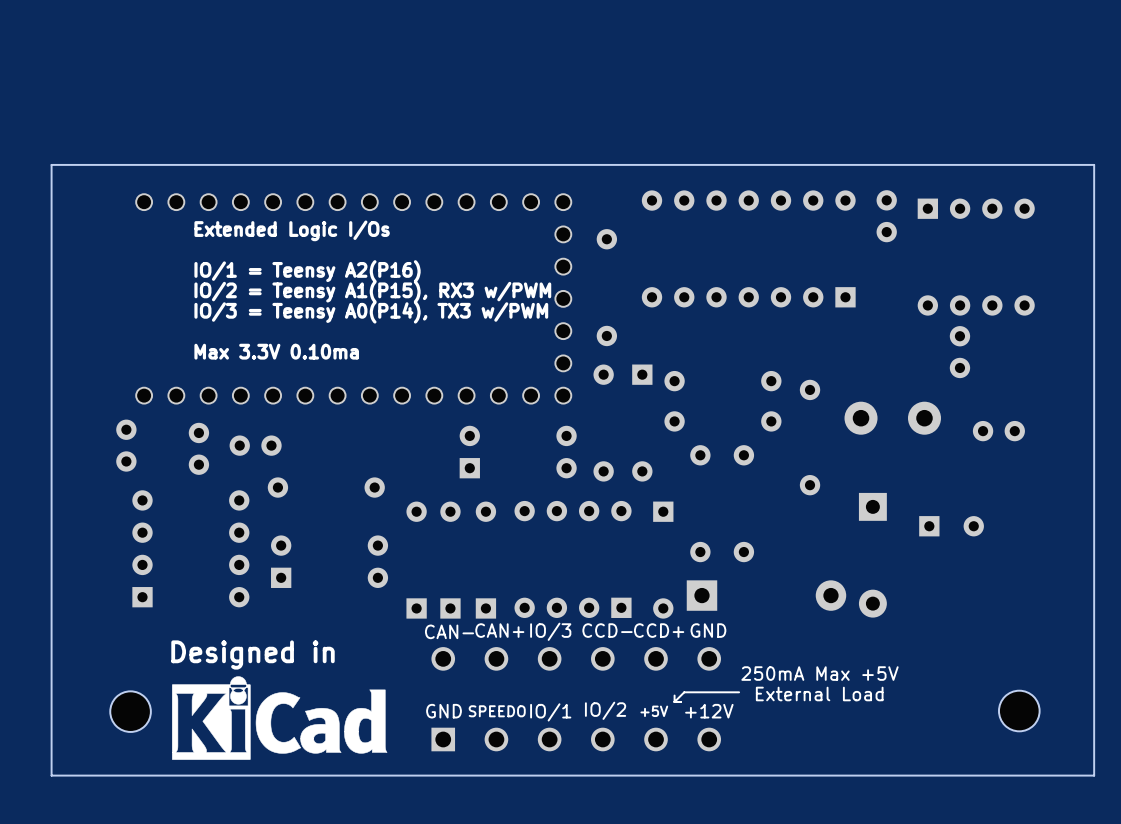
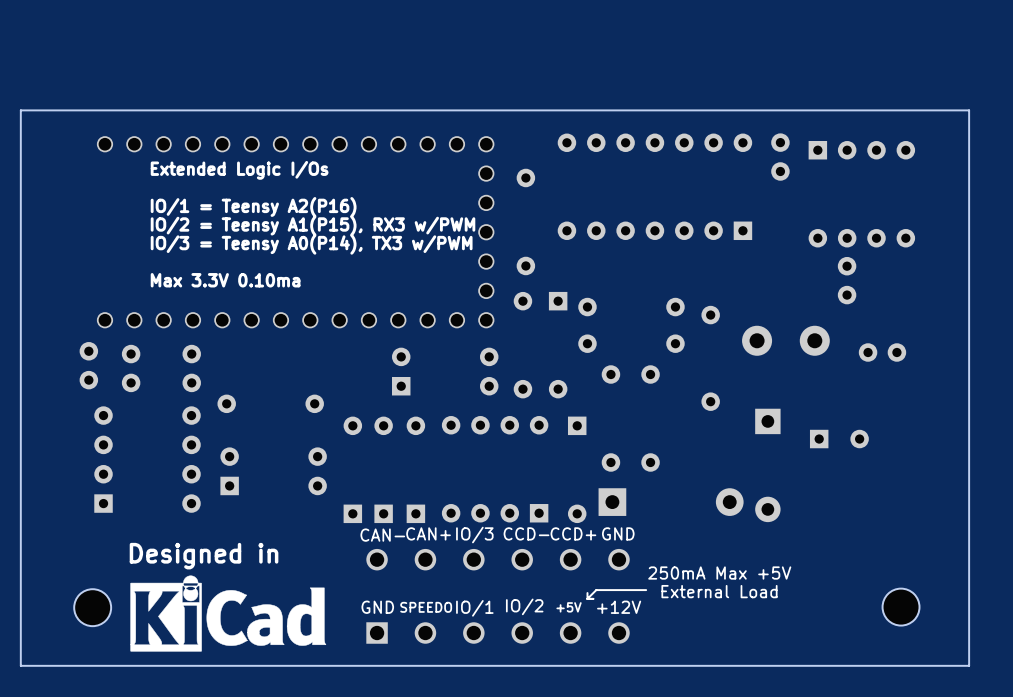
part rotation: 0° (255, 445) -> 90° clockwise (191, 368)
part: none -> (131, 368)
part: (198, 448) -> none

